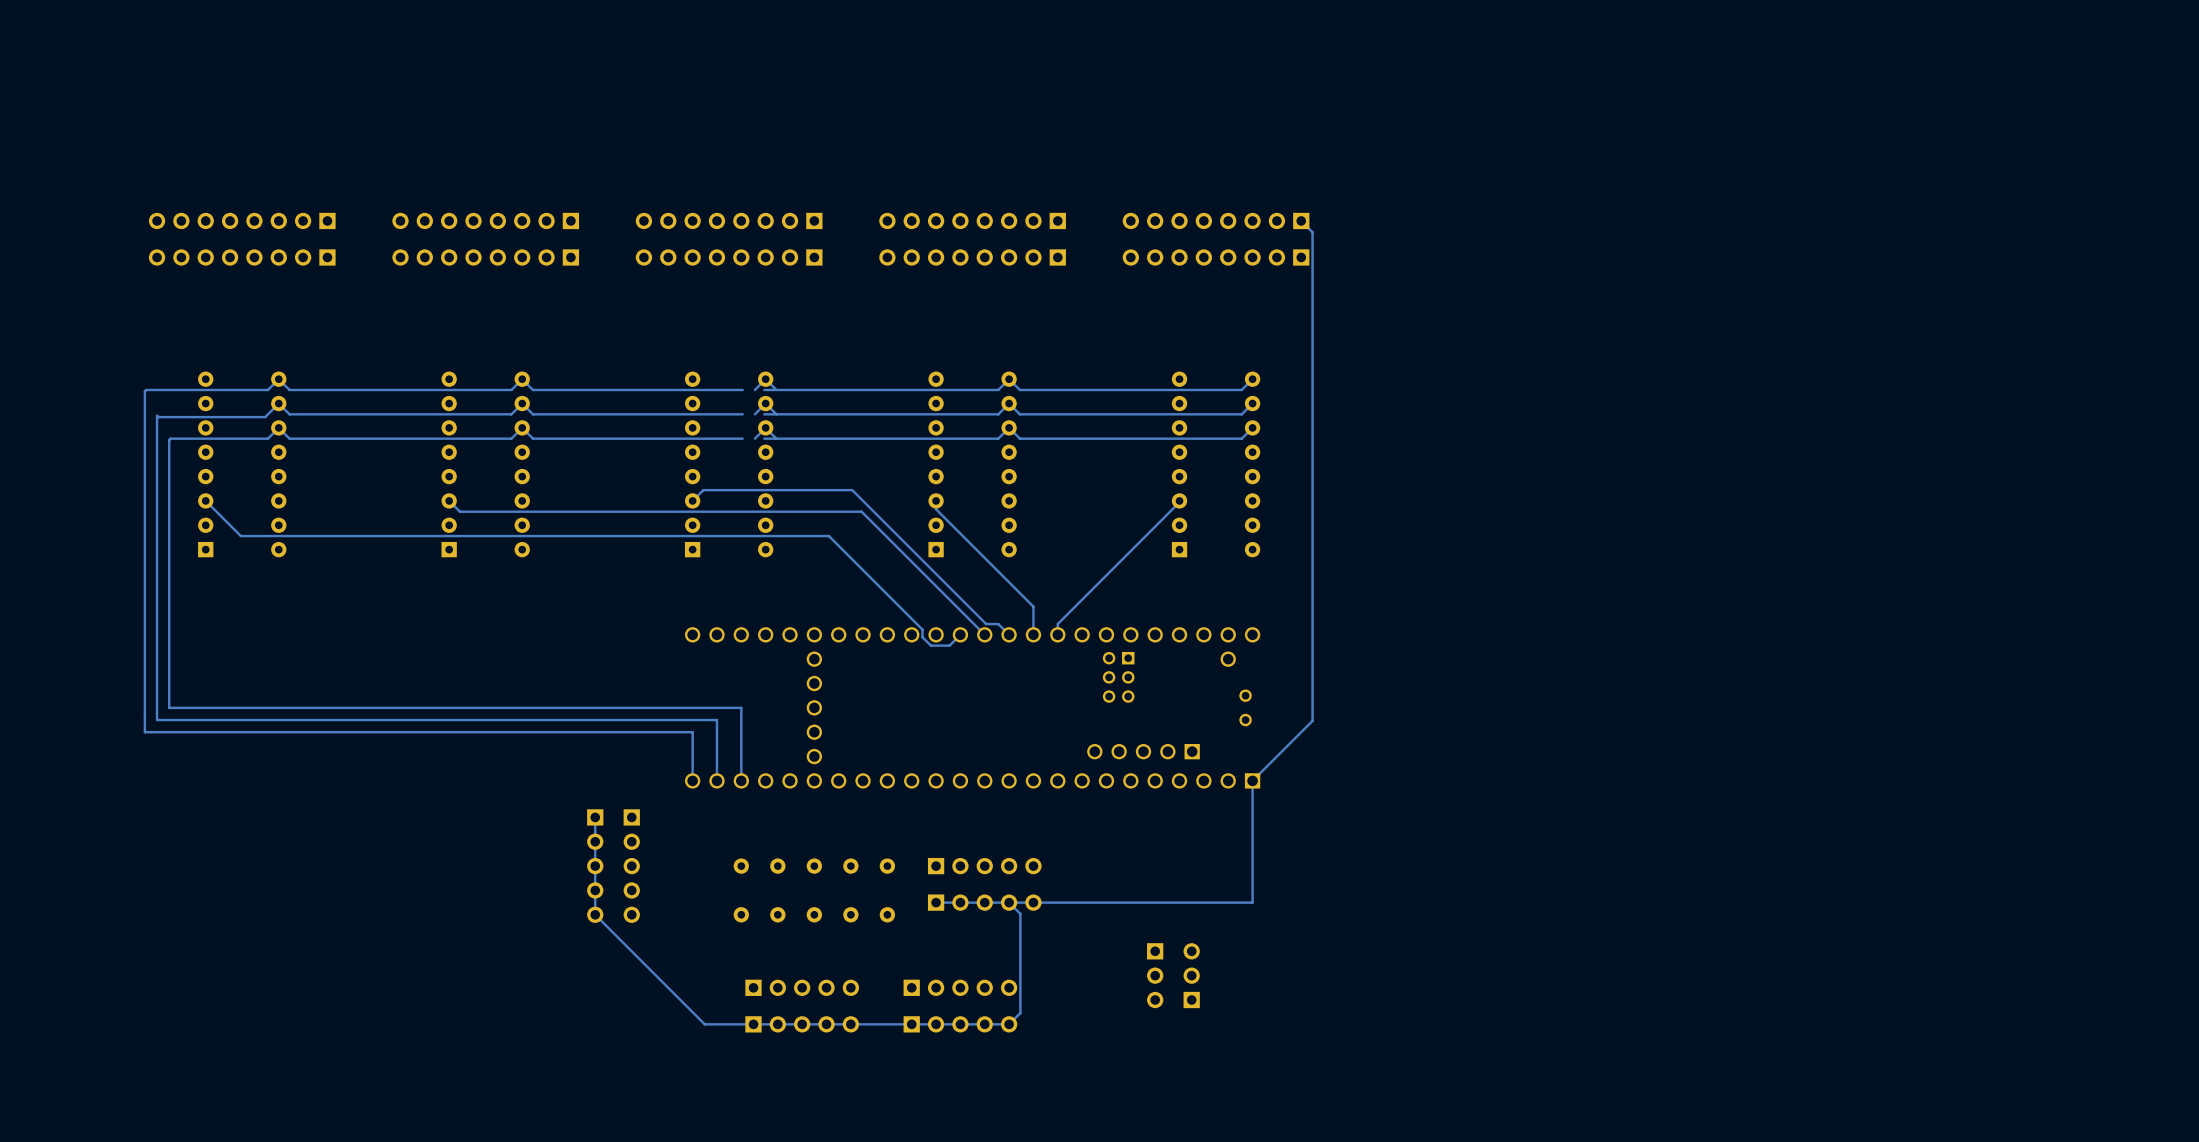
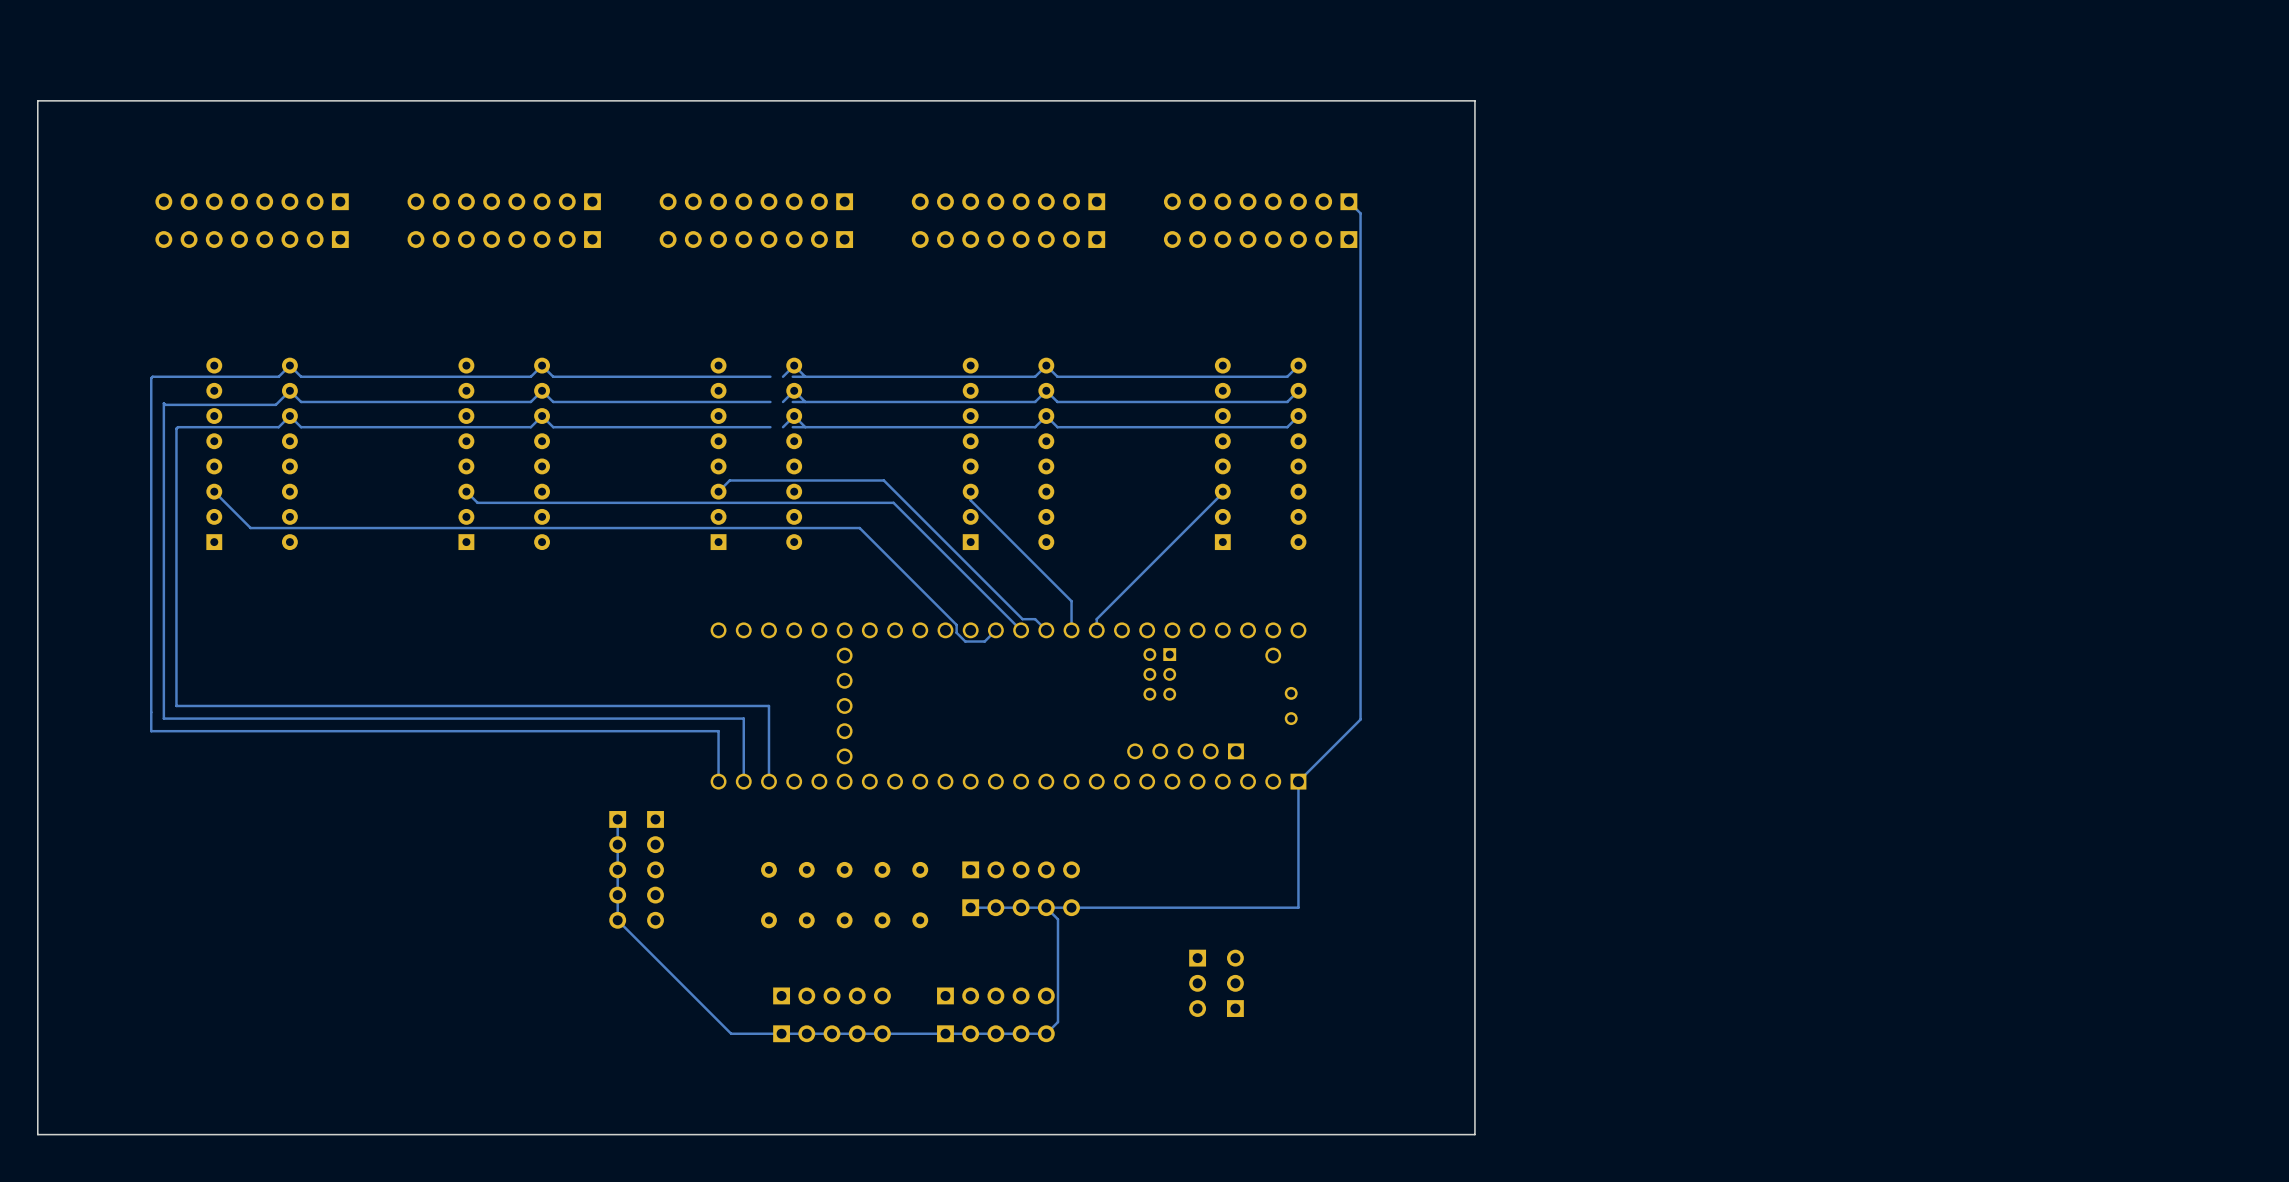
board edge: none -> (1474, 100) (37, 100) (37, 1134) (1474, 1134) (1474, 100)

